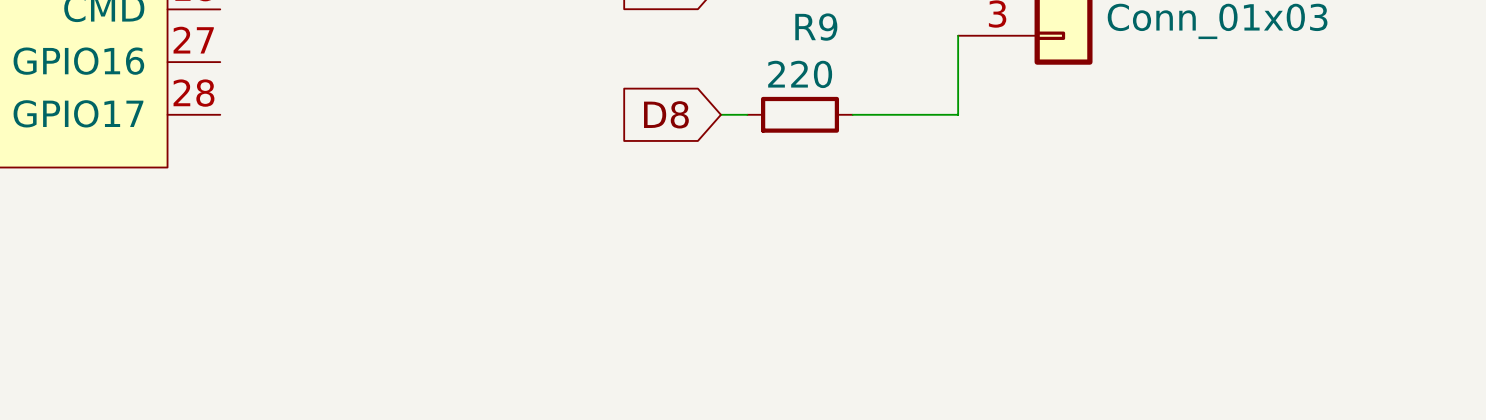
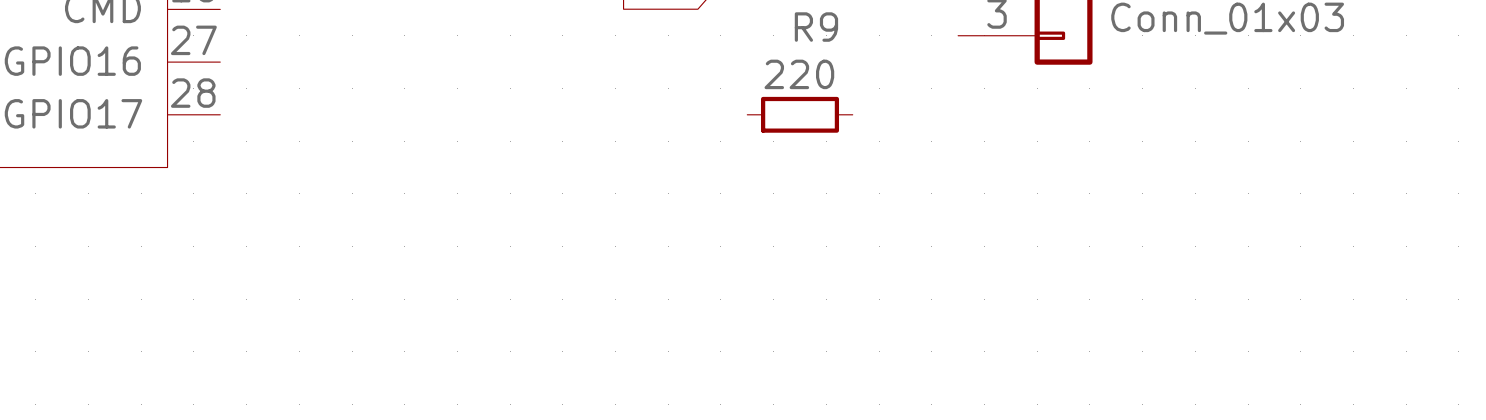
wire: (958, 35) (958, 114) (852, 114) -> none
global label: D8 (666, 114) -> none
wire: (720, 114) (747, 114) -> none

